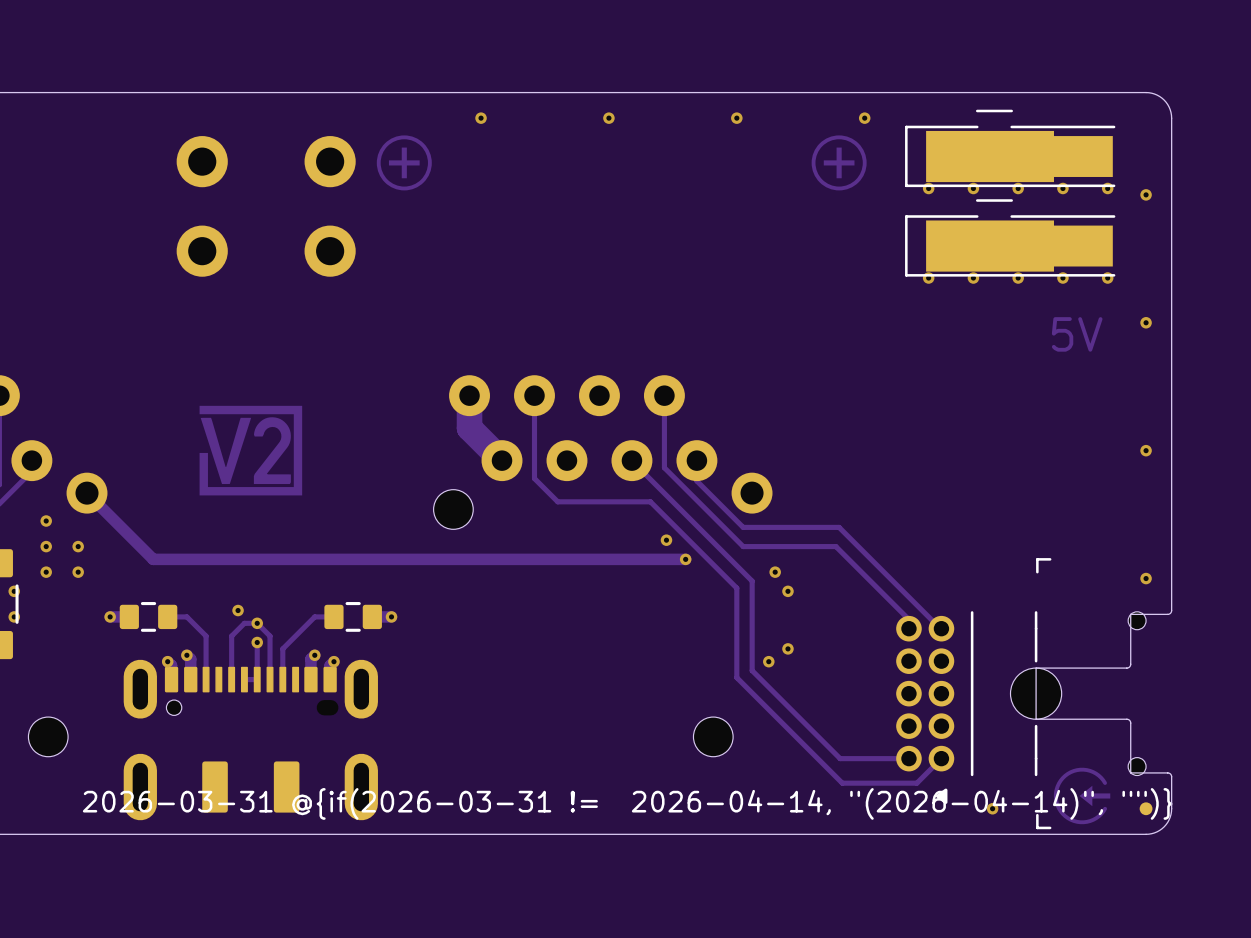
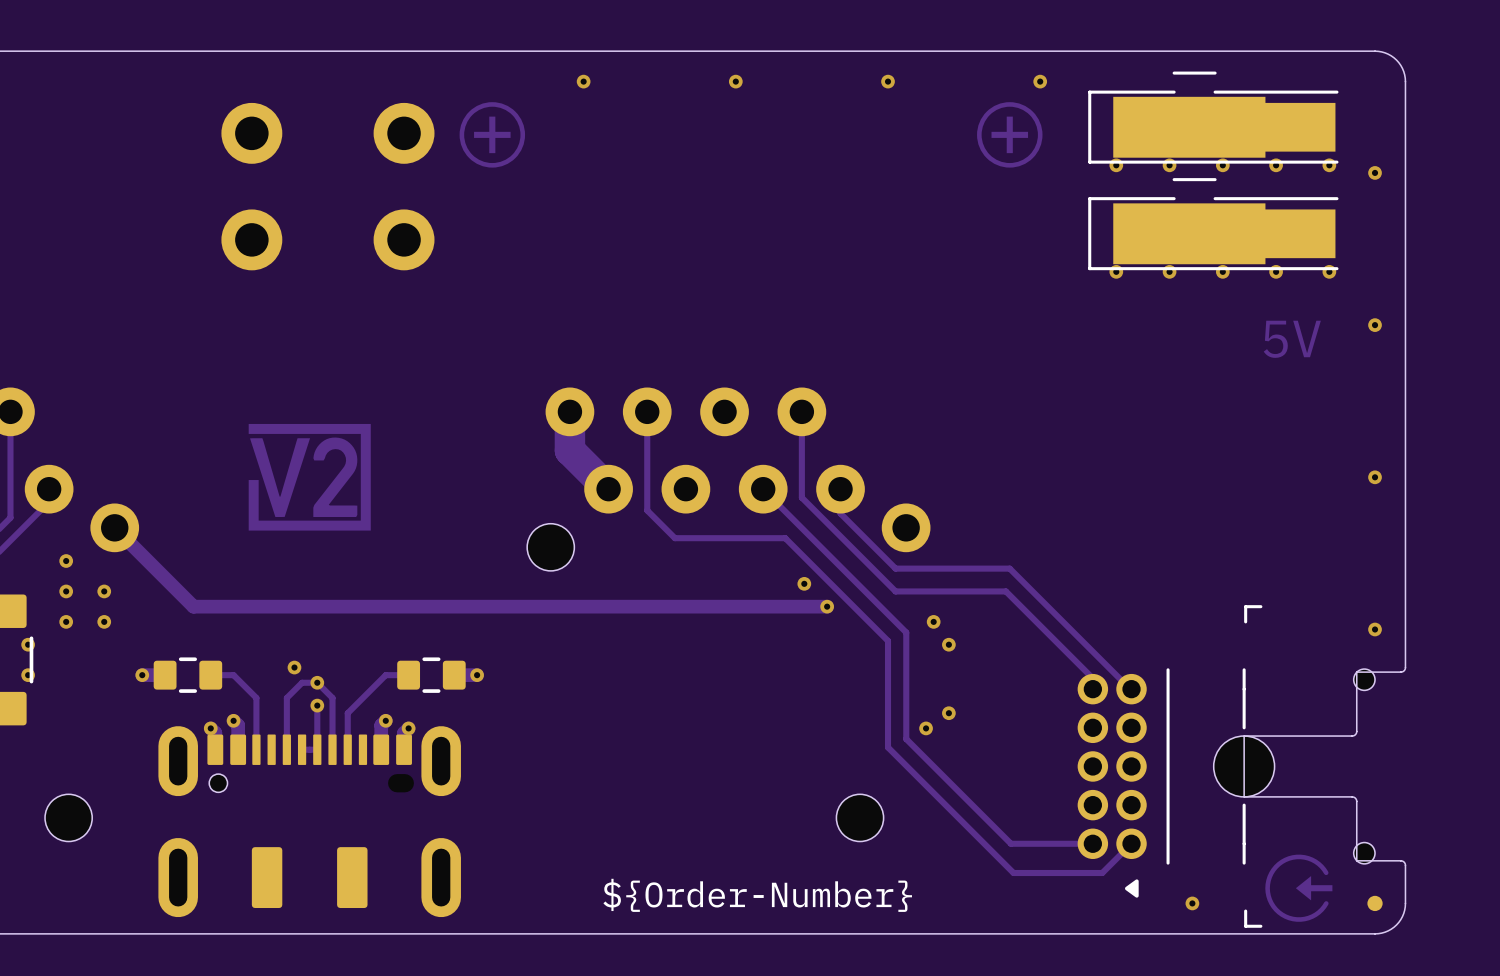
drawing shape: [82, 788, 1173, 820] -> [603, 878, 912, 912]

